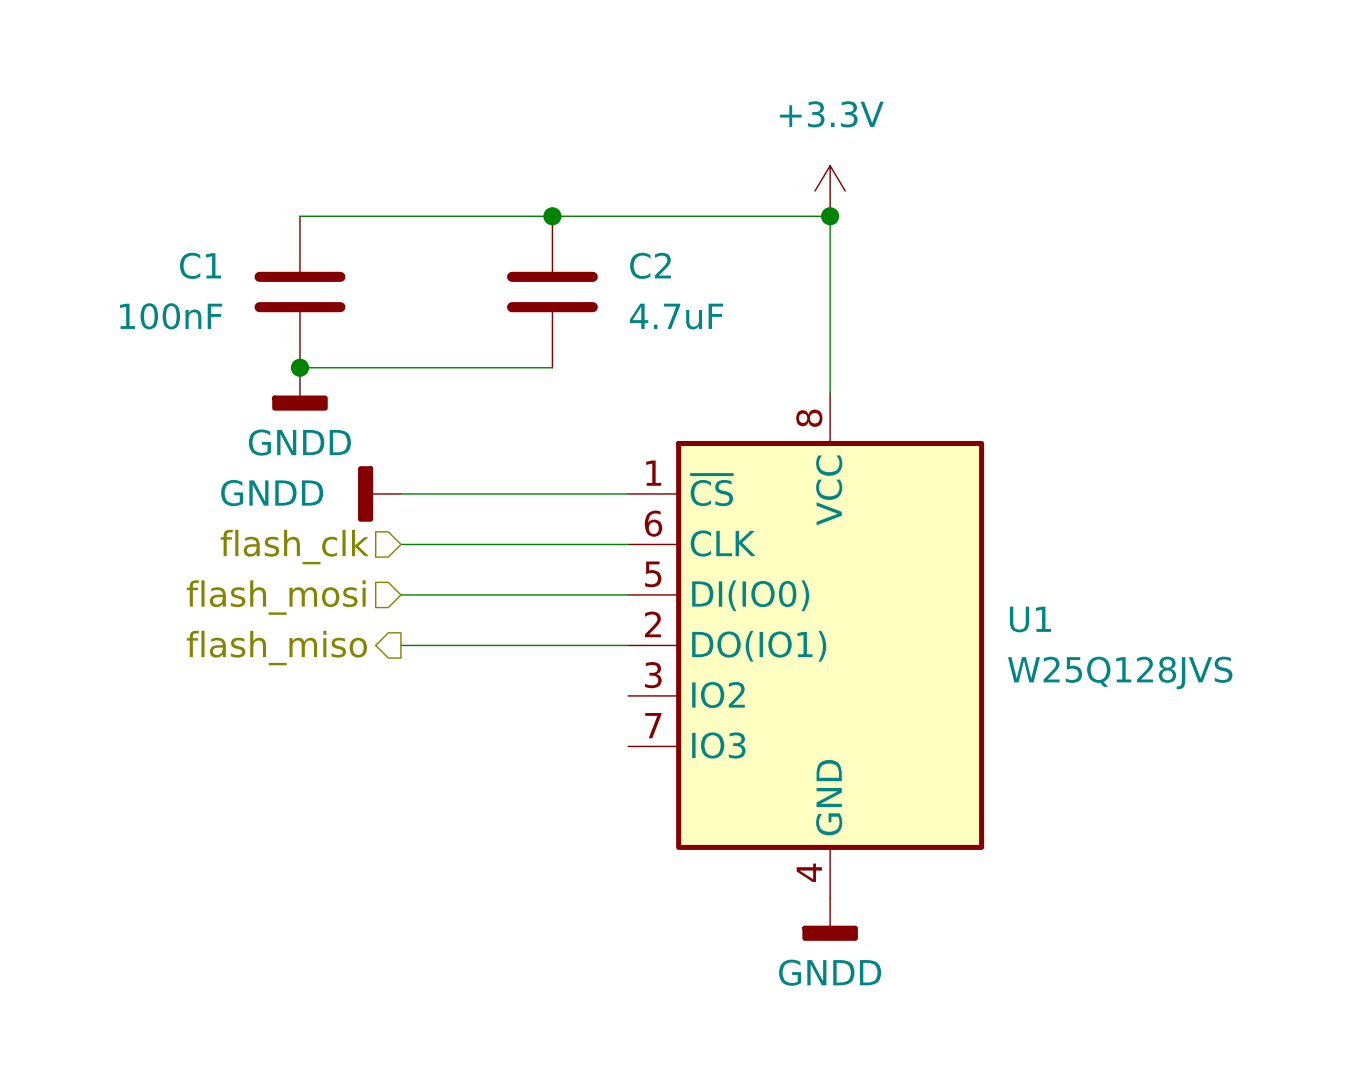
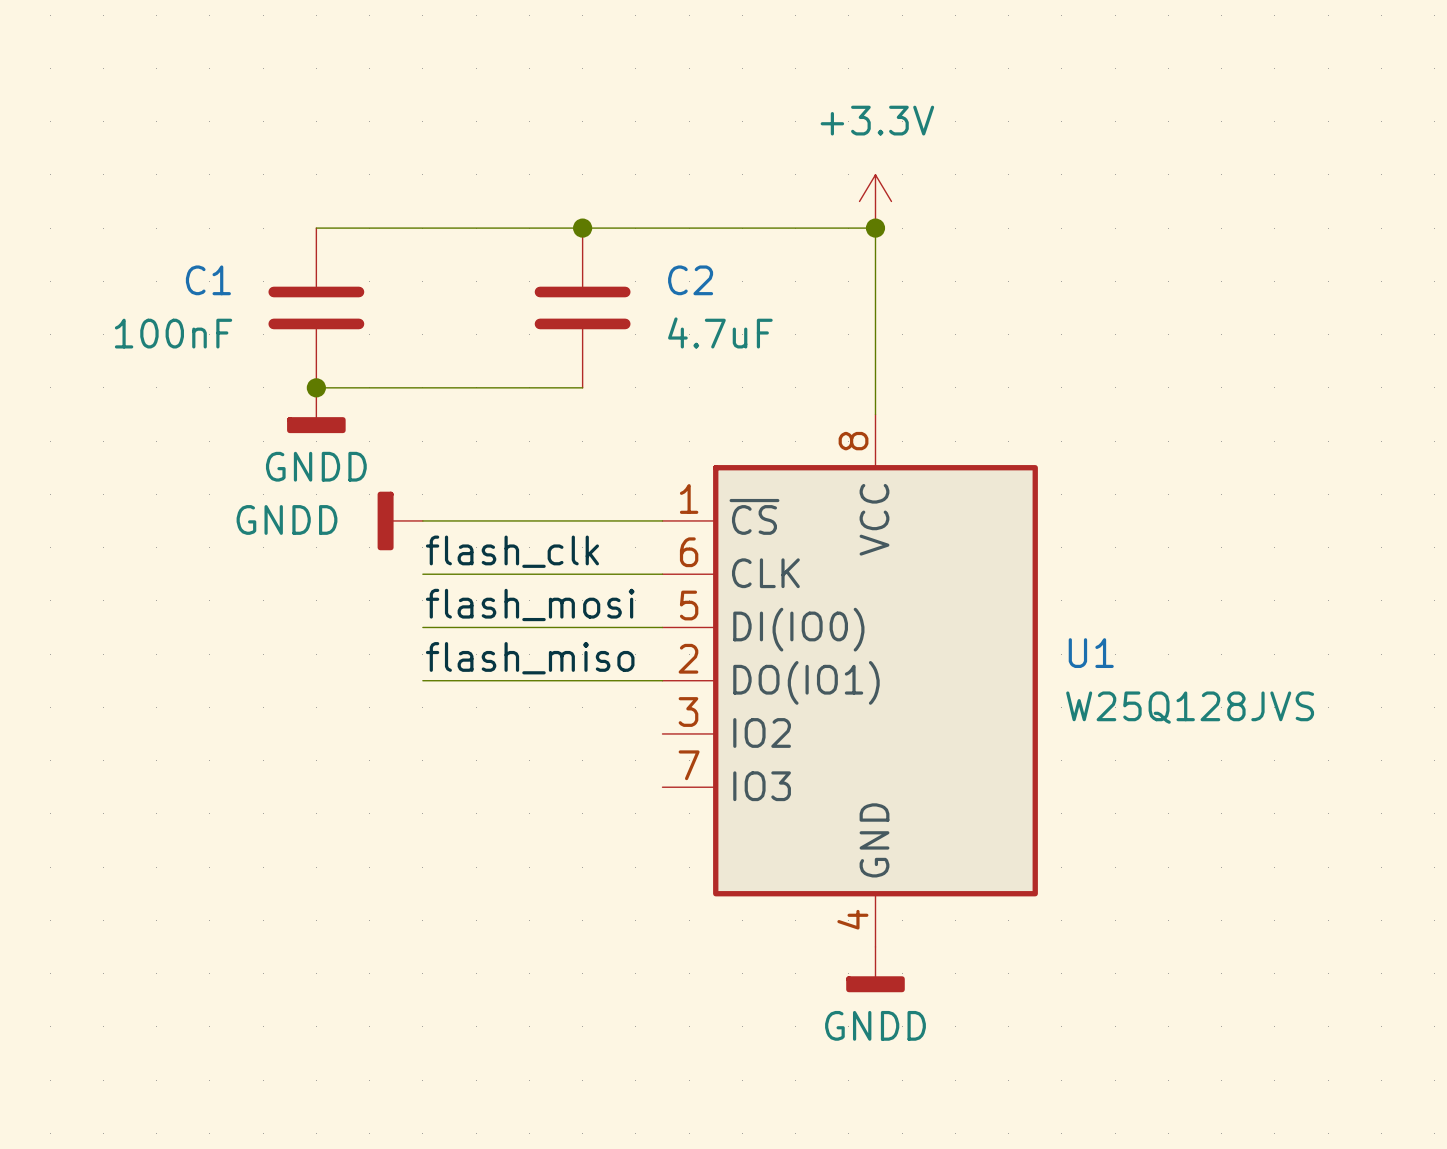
label: none -> flash_clk (512, 551)
hierarchical label: flash_clk (294, 547) -> none
label: none -> flash_mosi (530, 604)
hierarchical label: flash_mosi (276, 597) -> none
label: none -> flash_miso (530, 658)
hierarchical label: flash_miso (276, 648) -> none

